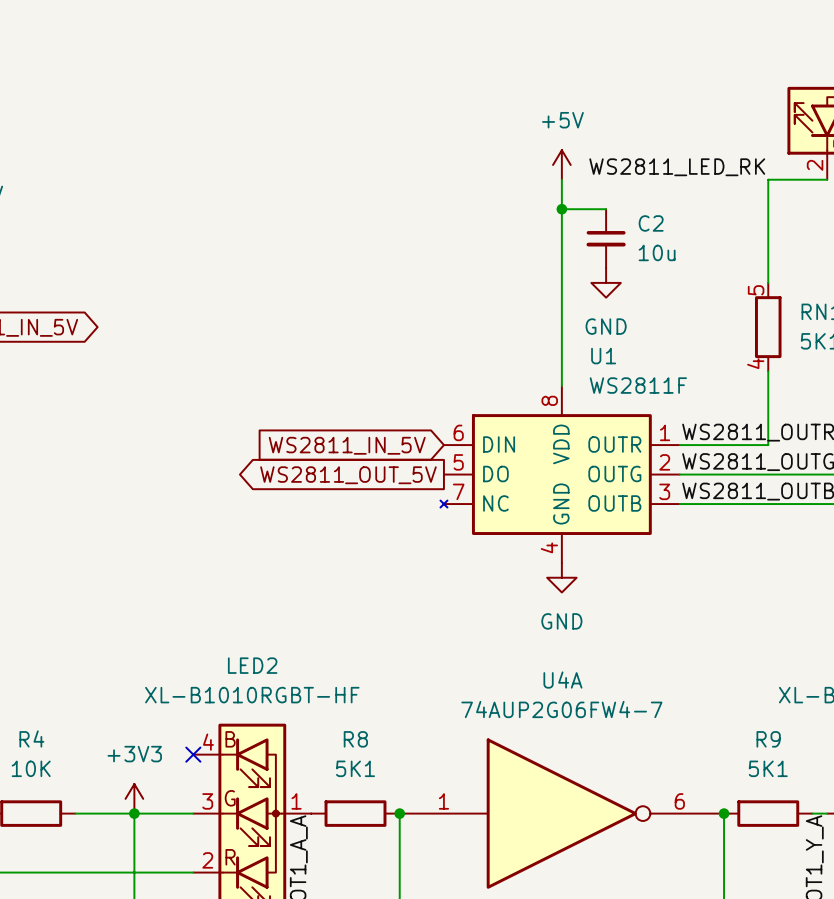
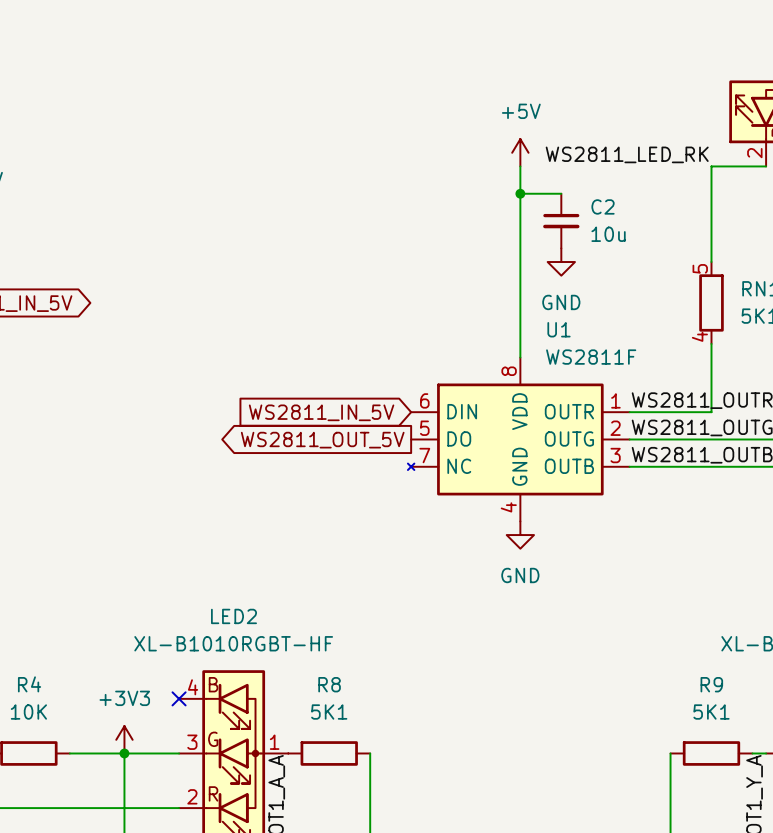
junction: (399, 813) -> none
U4A: 74AUP2G06FW4-7 (561, 813) -> none
junction: (724, 813) -> none

